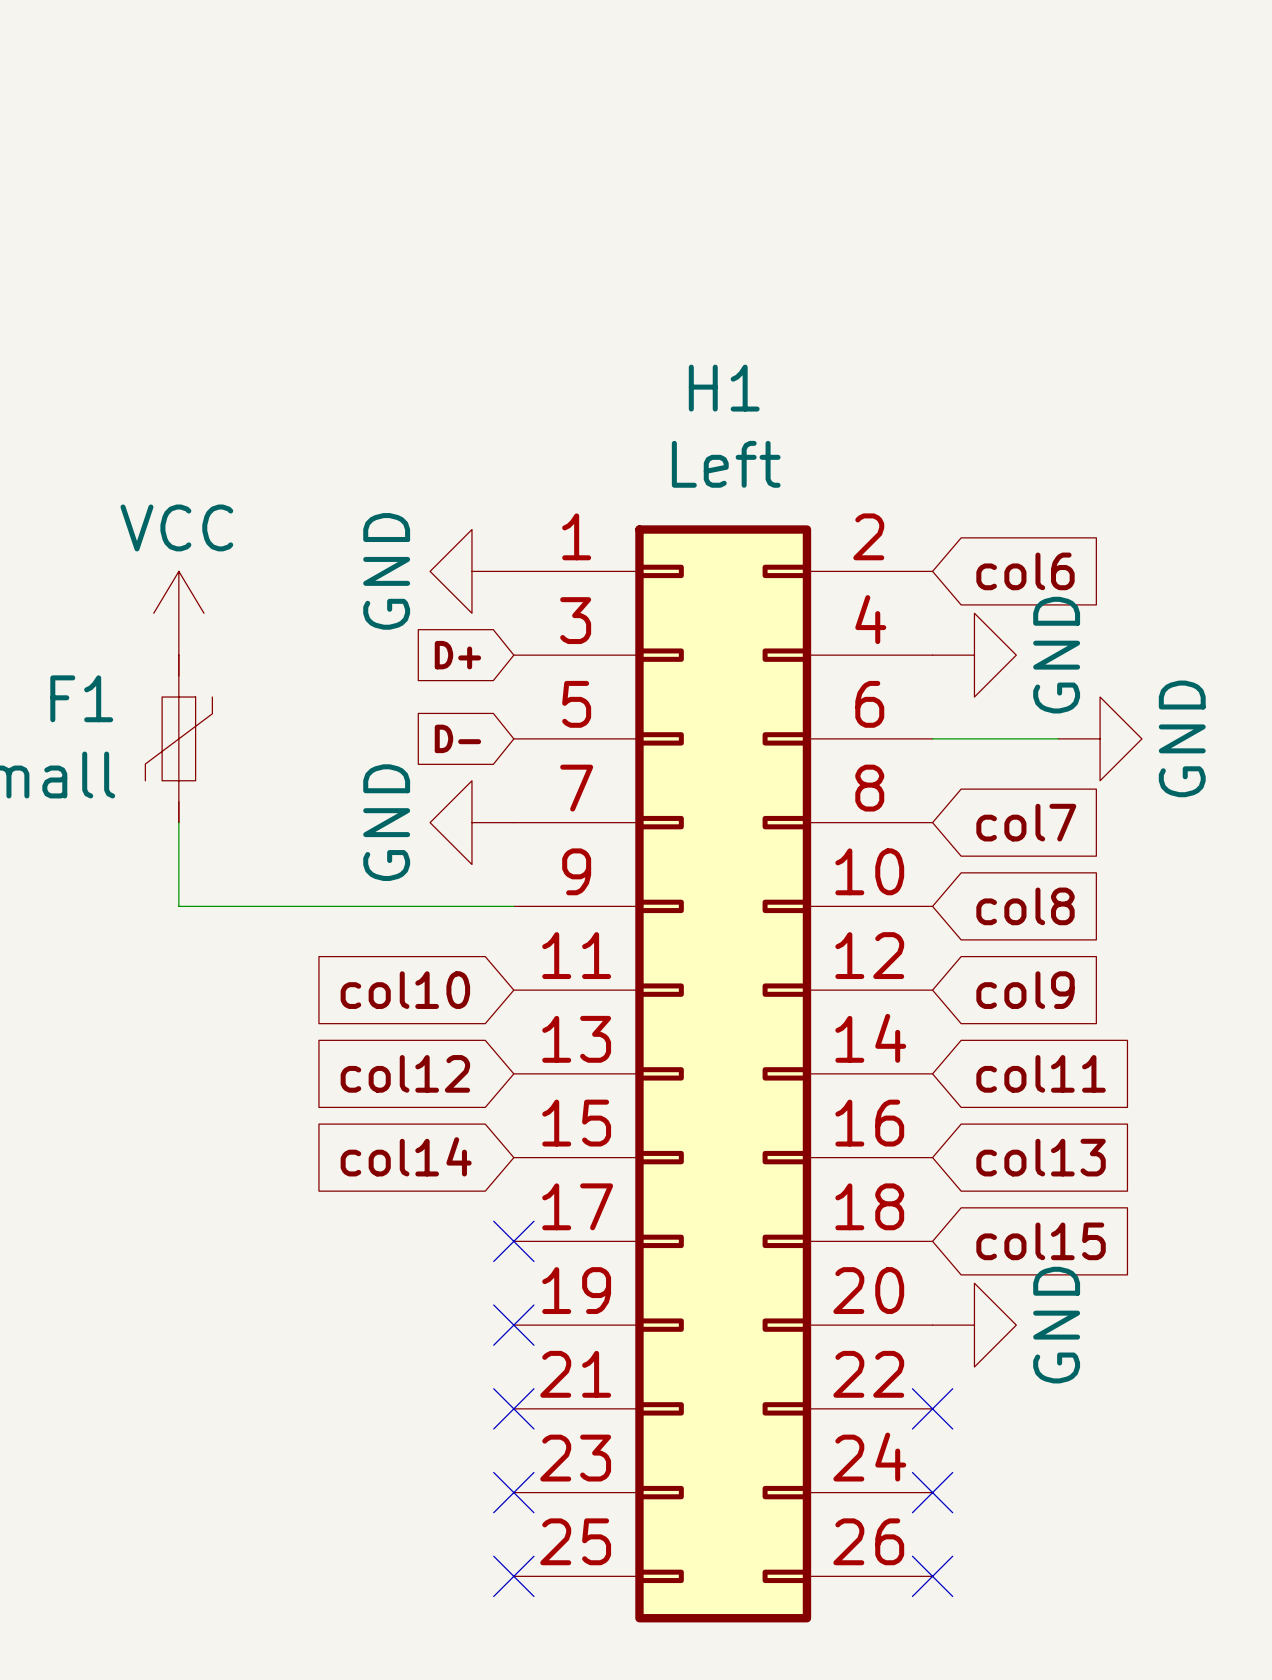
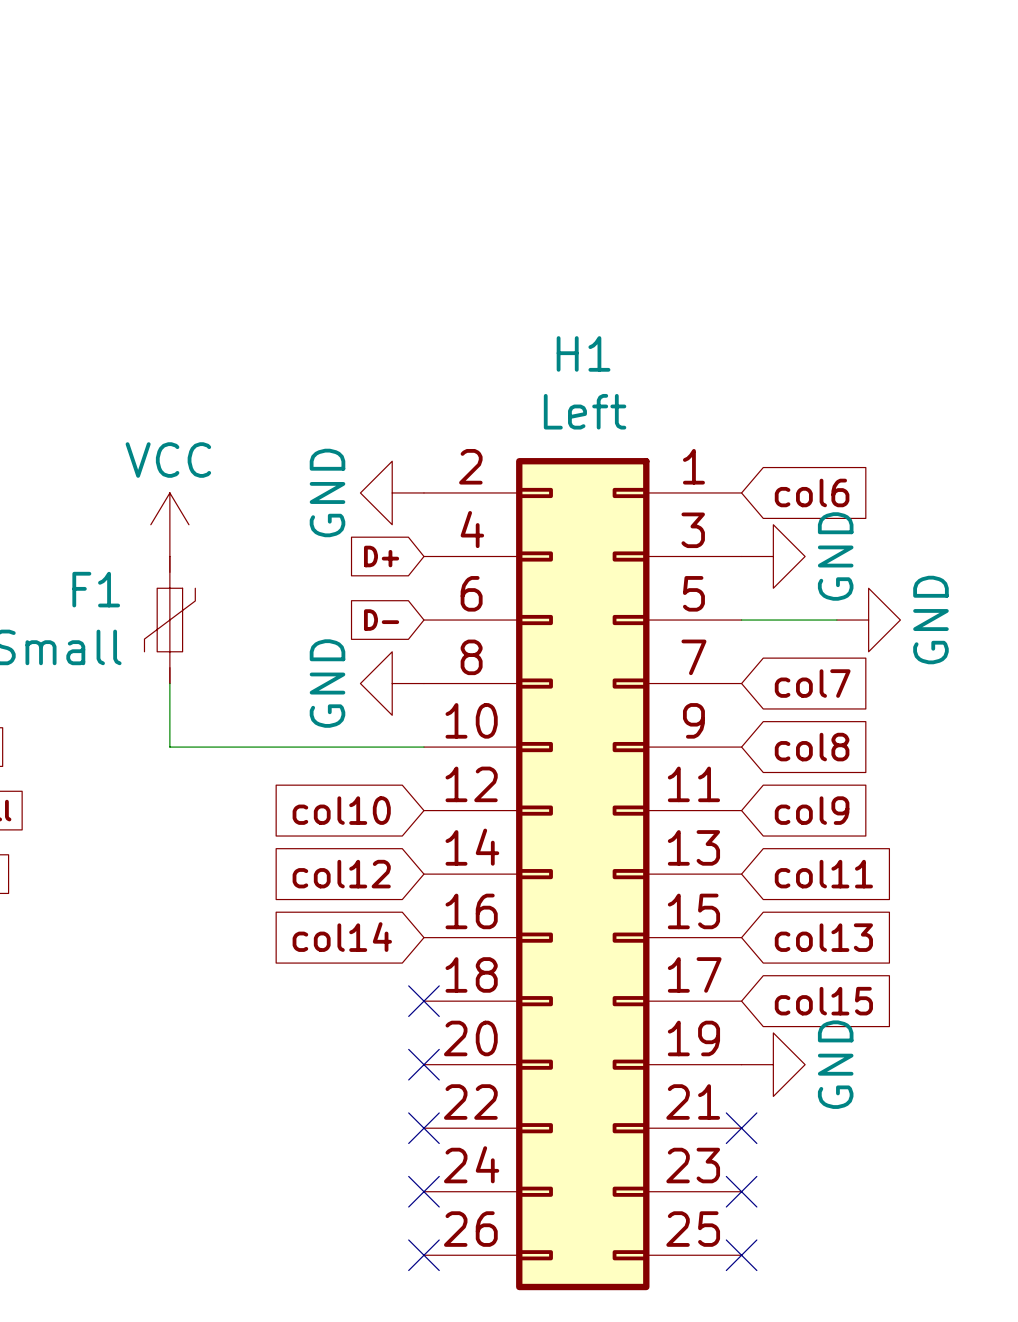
H1 flip: as is (723, 1073) -> left-right (582, 874)

